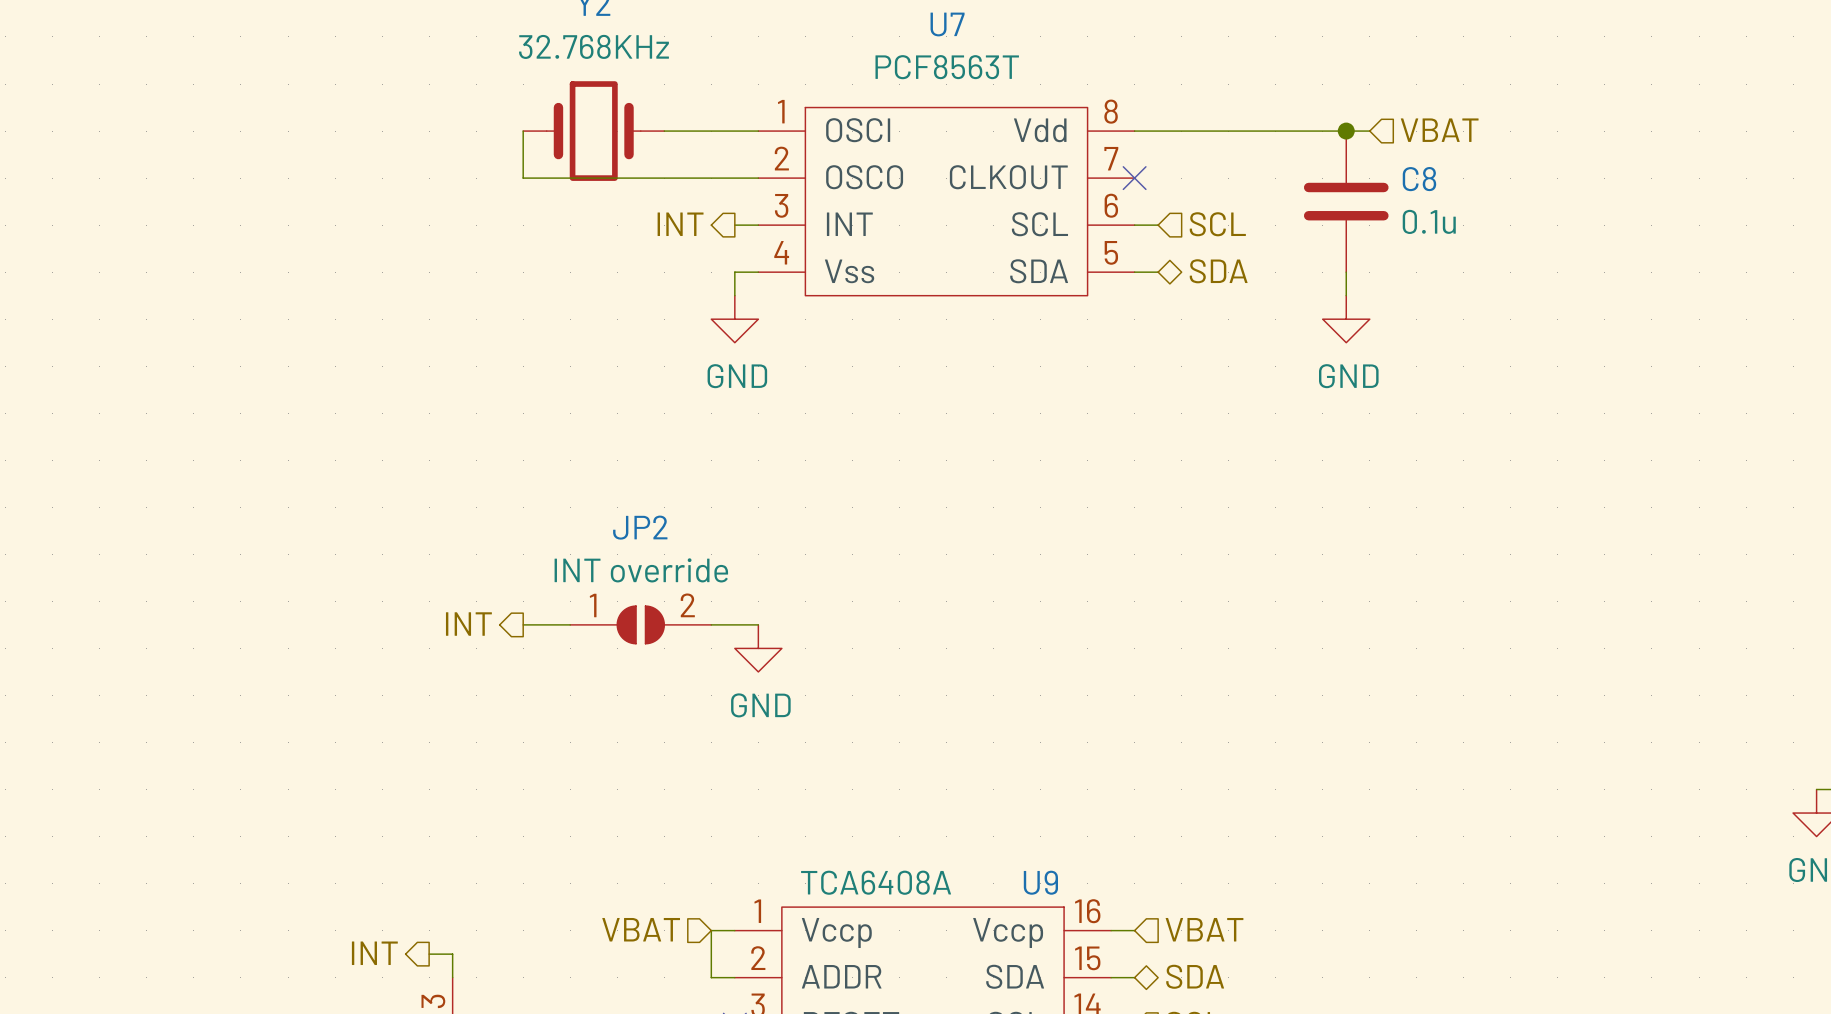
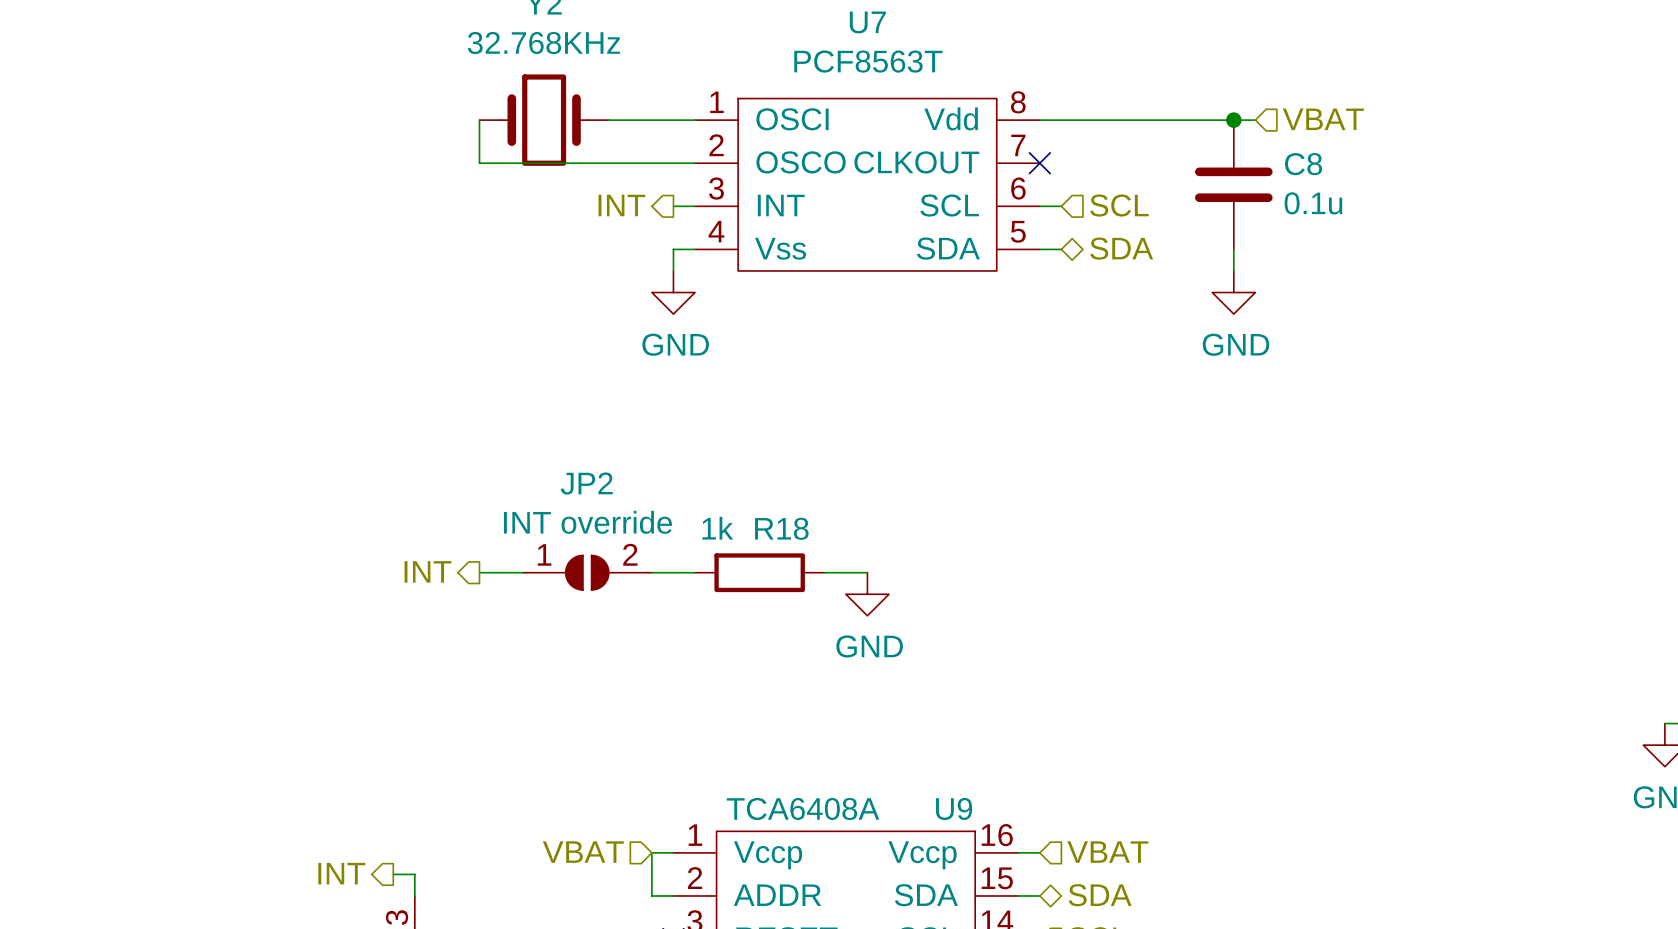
R18: none -> 1k (759, 572)
wire: none -> (824, 572) (867, 572)
power symbol position: GND (758, 648) -> GND (867, 594)

